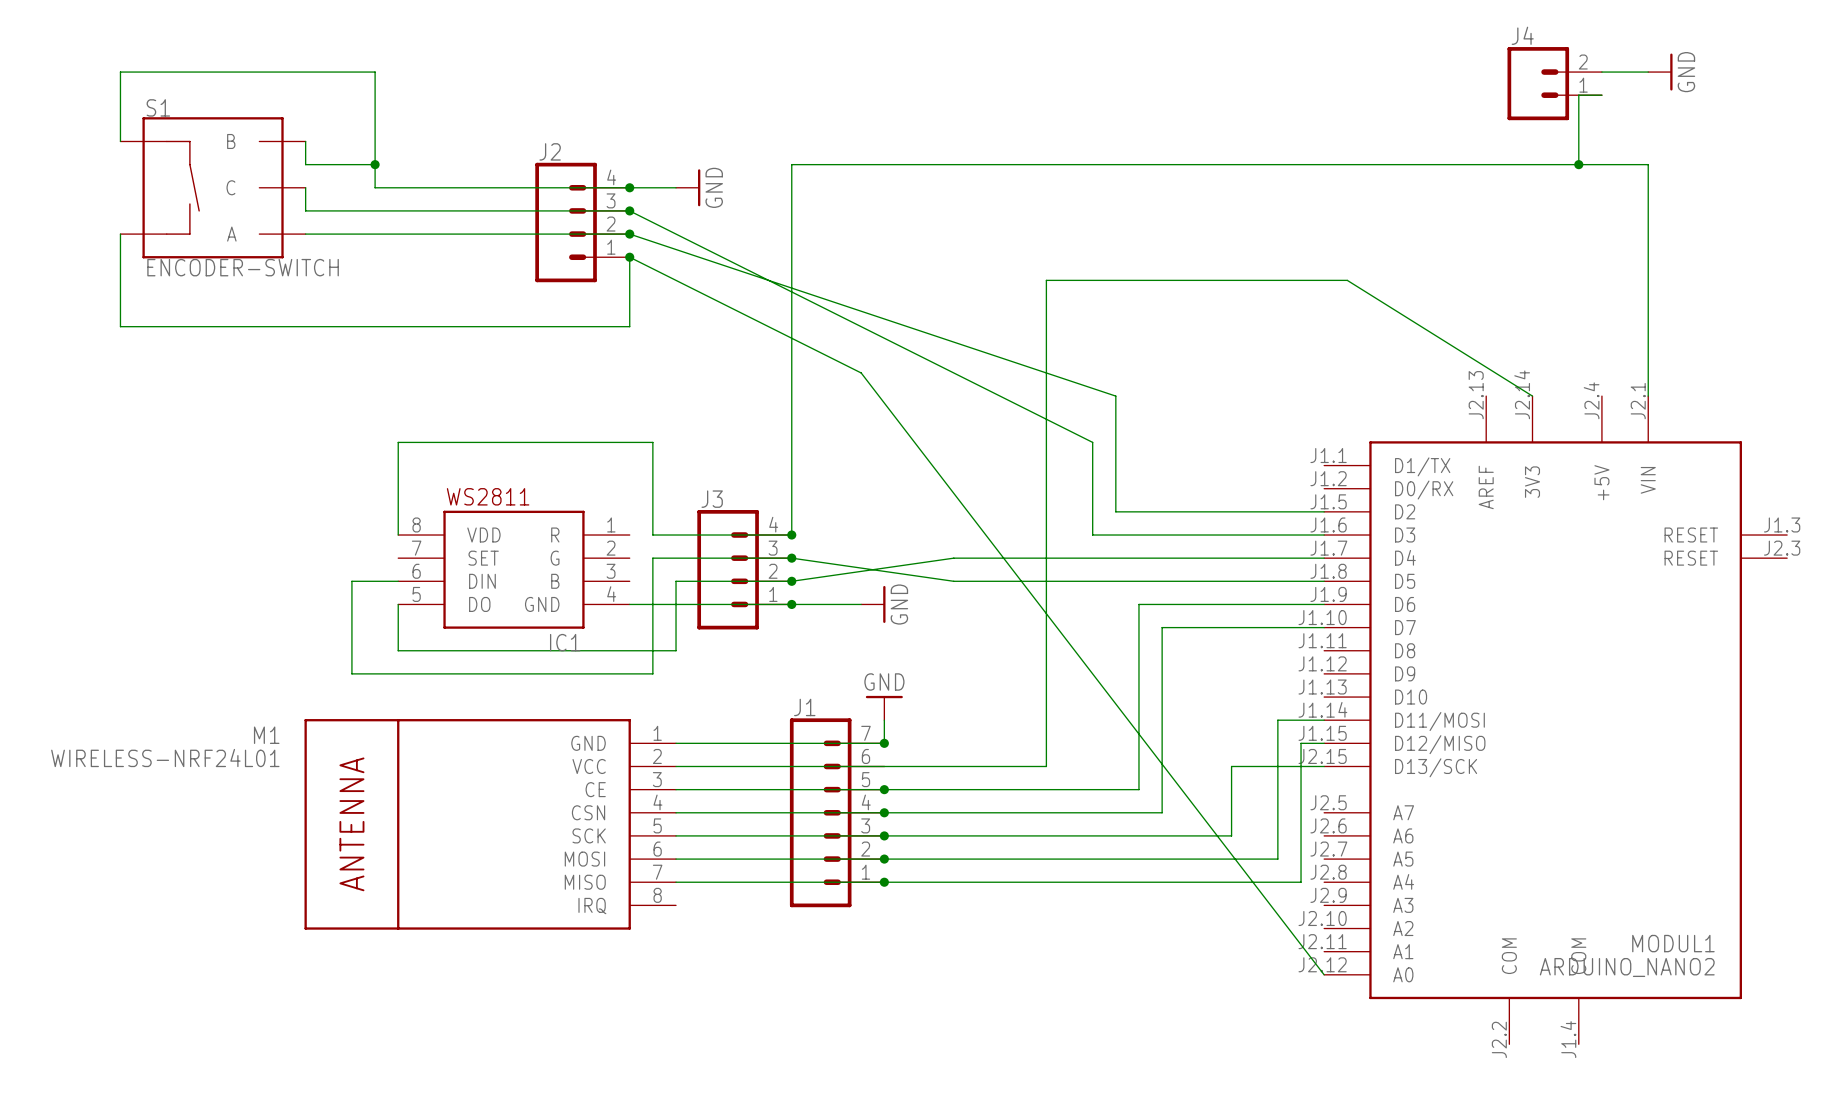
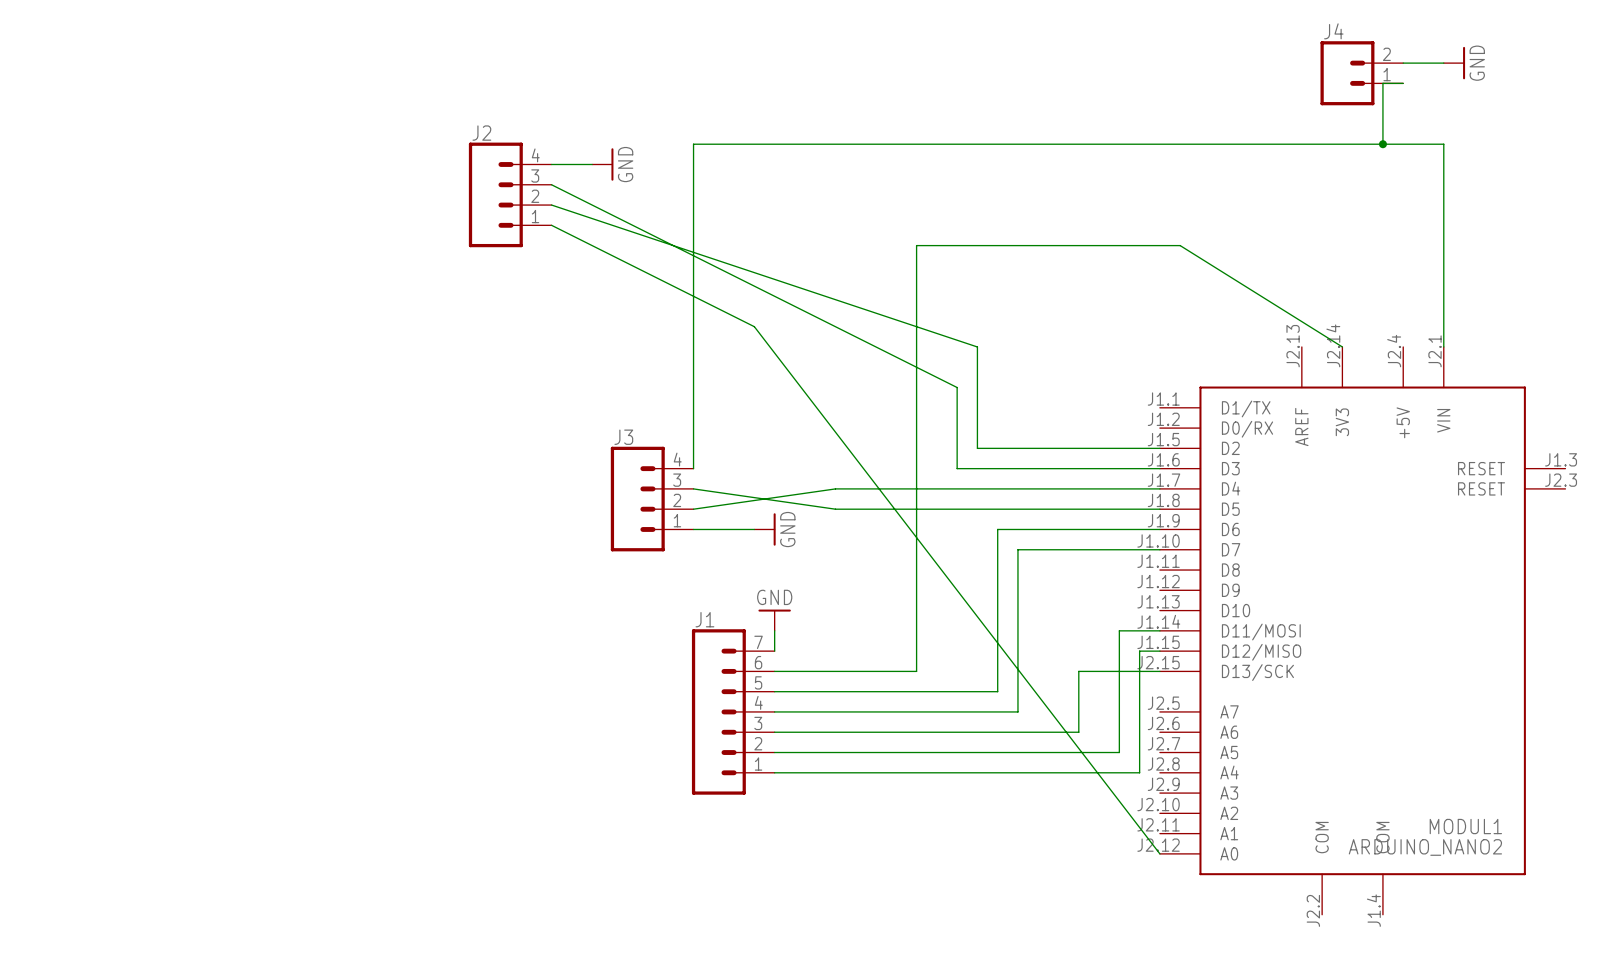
wire: (120, 141) (120, 72) (375, 72) (375, 187) (629, 187) -> none
wire: (305, 141) (305, 164) (375, 164) -> none
junction: (375, 164) -> none
S1: ENCODER-SWITCH (213, 187) -> none
wire: (305, 187) (305, 210) (629, 210) -> none
junction: (629, 187) -> none
junction: (629, 210) -> none
wire: (120, 234) (120, 326) (629, 326) (629, 257) -> none
wire: (305, 234) (629, 234) -> none
junction: (629, 234) -> none
junction: (629, 257) -> none
wire: (398, 535) (398, 442) (652, 442) (652, 535) (791, 535) -> none
junction: (791, 535) -> none
wire: (791, 558) (652, 558) (652, 673) (351, 673) (351, 581) (398, 581) -> none
junction: (791, 558) -> none
IC1: (513, 569) -> none
wire: (791, 581) (676, 581) (676, 650) (398, 650) (398, 604) -> none
junction: (791, 581) -> none
wire: (629, 604) (791, 604) -> none
junction: (791, 604) -> none
wire: (676, 743) (884, 743) -> none
junction: (884, 743) -> none
wire: (676, 766) (884, 766) -> none
wire: (676, 789) (884, 789) -> none
junction: (884, 789) -> none
wire: (676, 812) (884, 812) -> none
junction: (884, 812) -> none
M1: WIRELESS-NRF24L01 (490, 824) -> none
wire: (676, 835) (884, 835) -> none
junction: (884, 835) -> none
wire: (676, 859) (884, 859) -> none
junction: (884, 859) -> none
wire: (676, 882) (884, 882) -> none
junction: (884, 882) -> none

